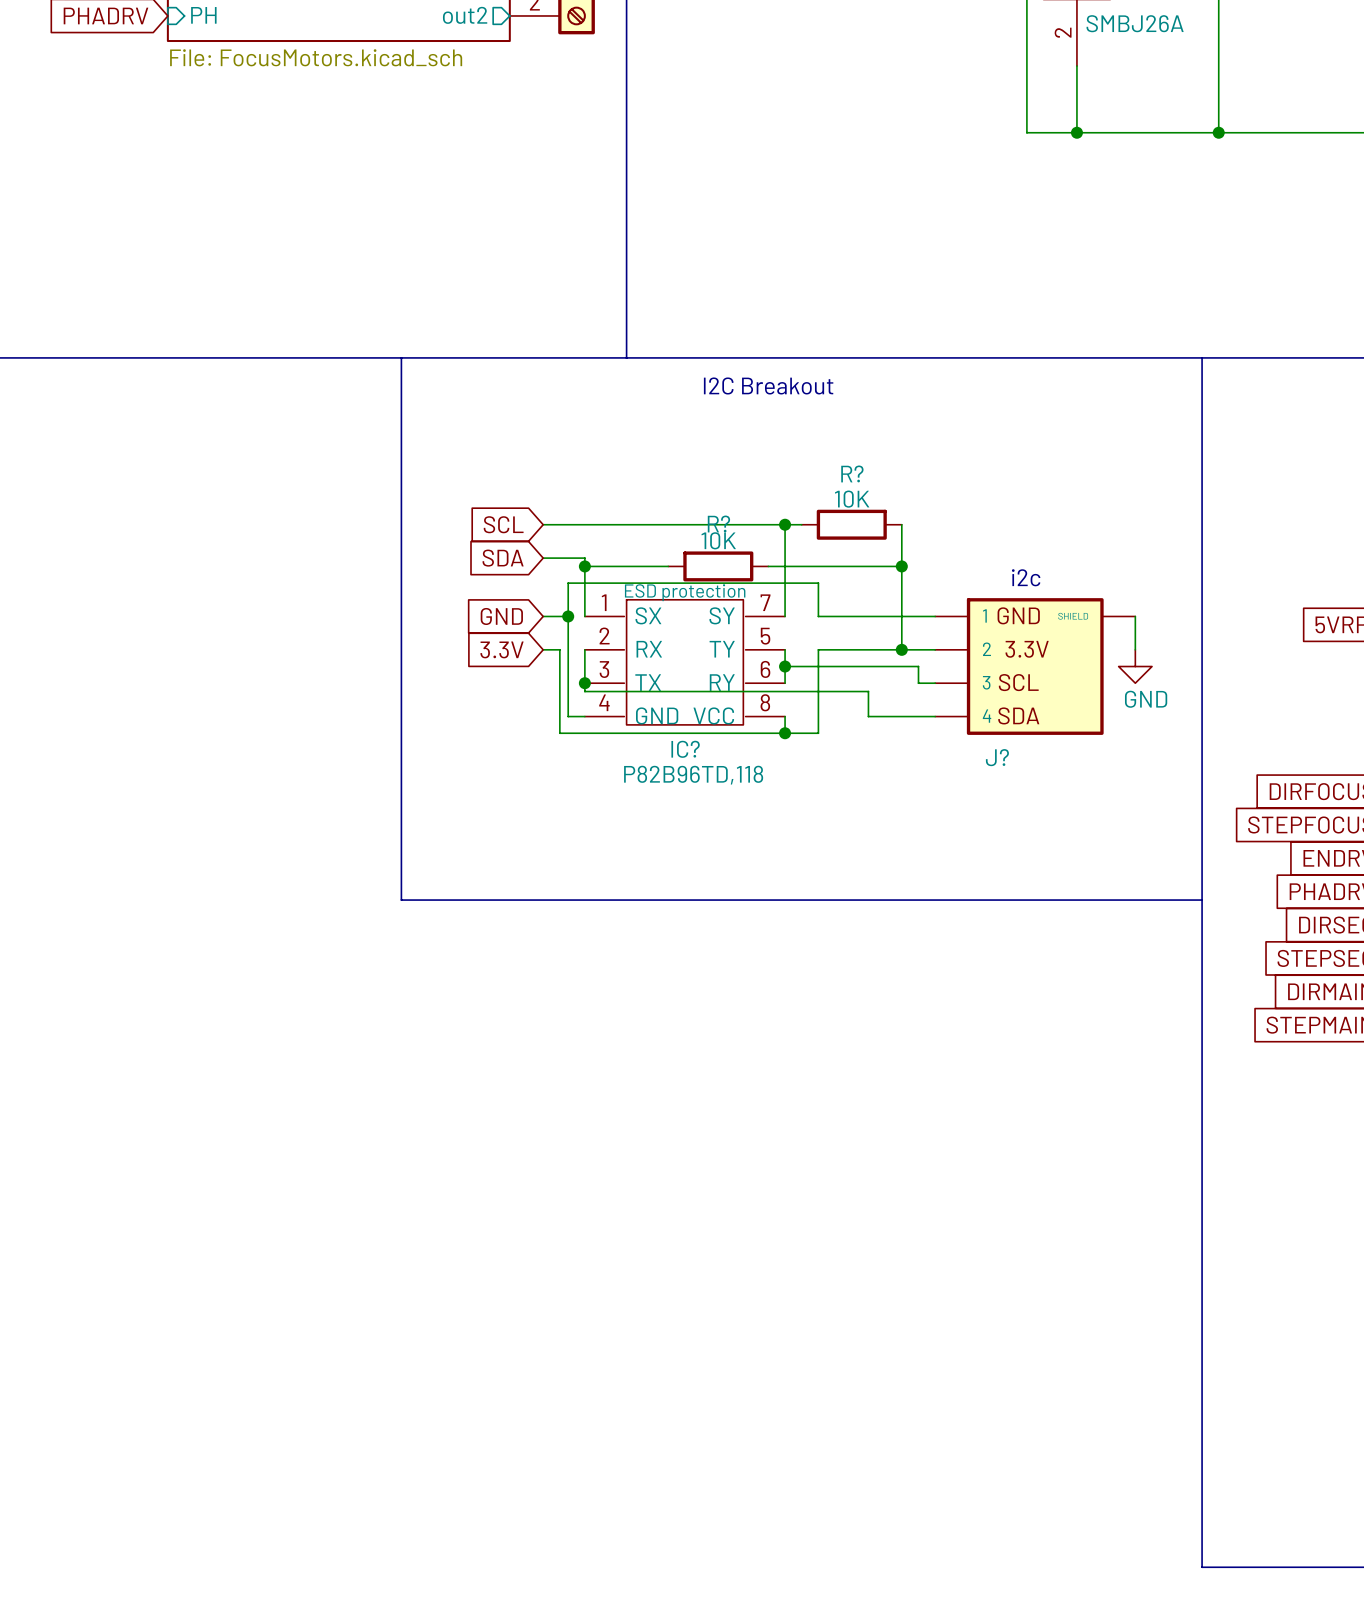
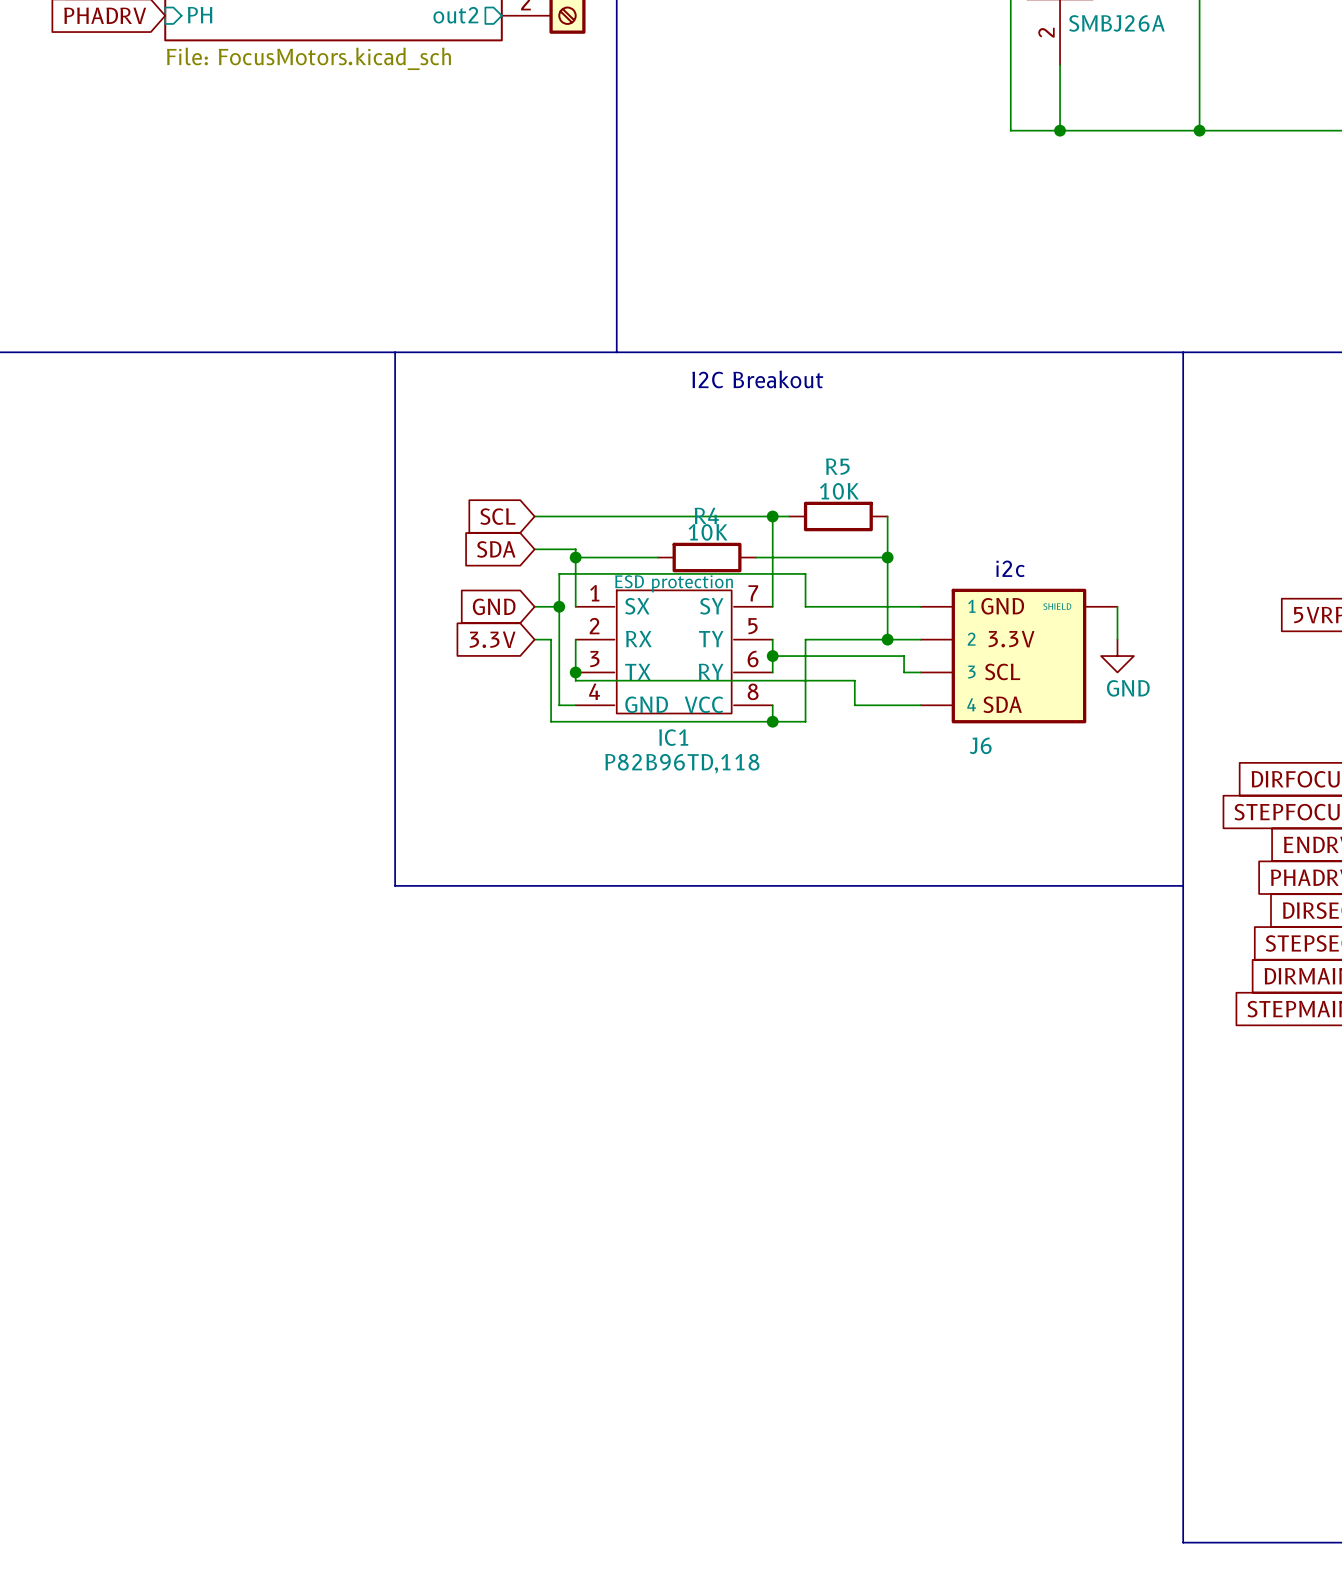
R? name: R? (852, 473) -> R5 (837, 466)
R? name: R? (718, 524) -> R4 (706, 515)
IC? name: IC? (685, 749) -> IC1 (673, 737)
J? name: J? (997, 757) -> J6 (980, 745)

